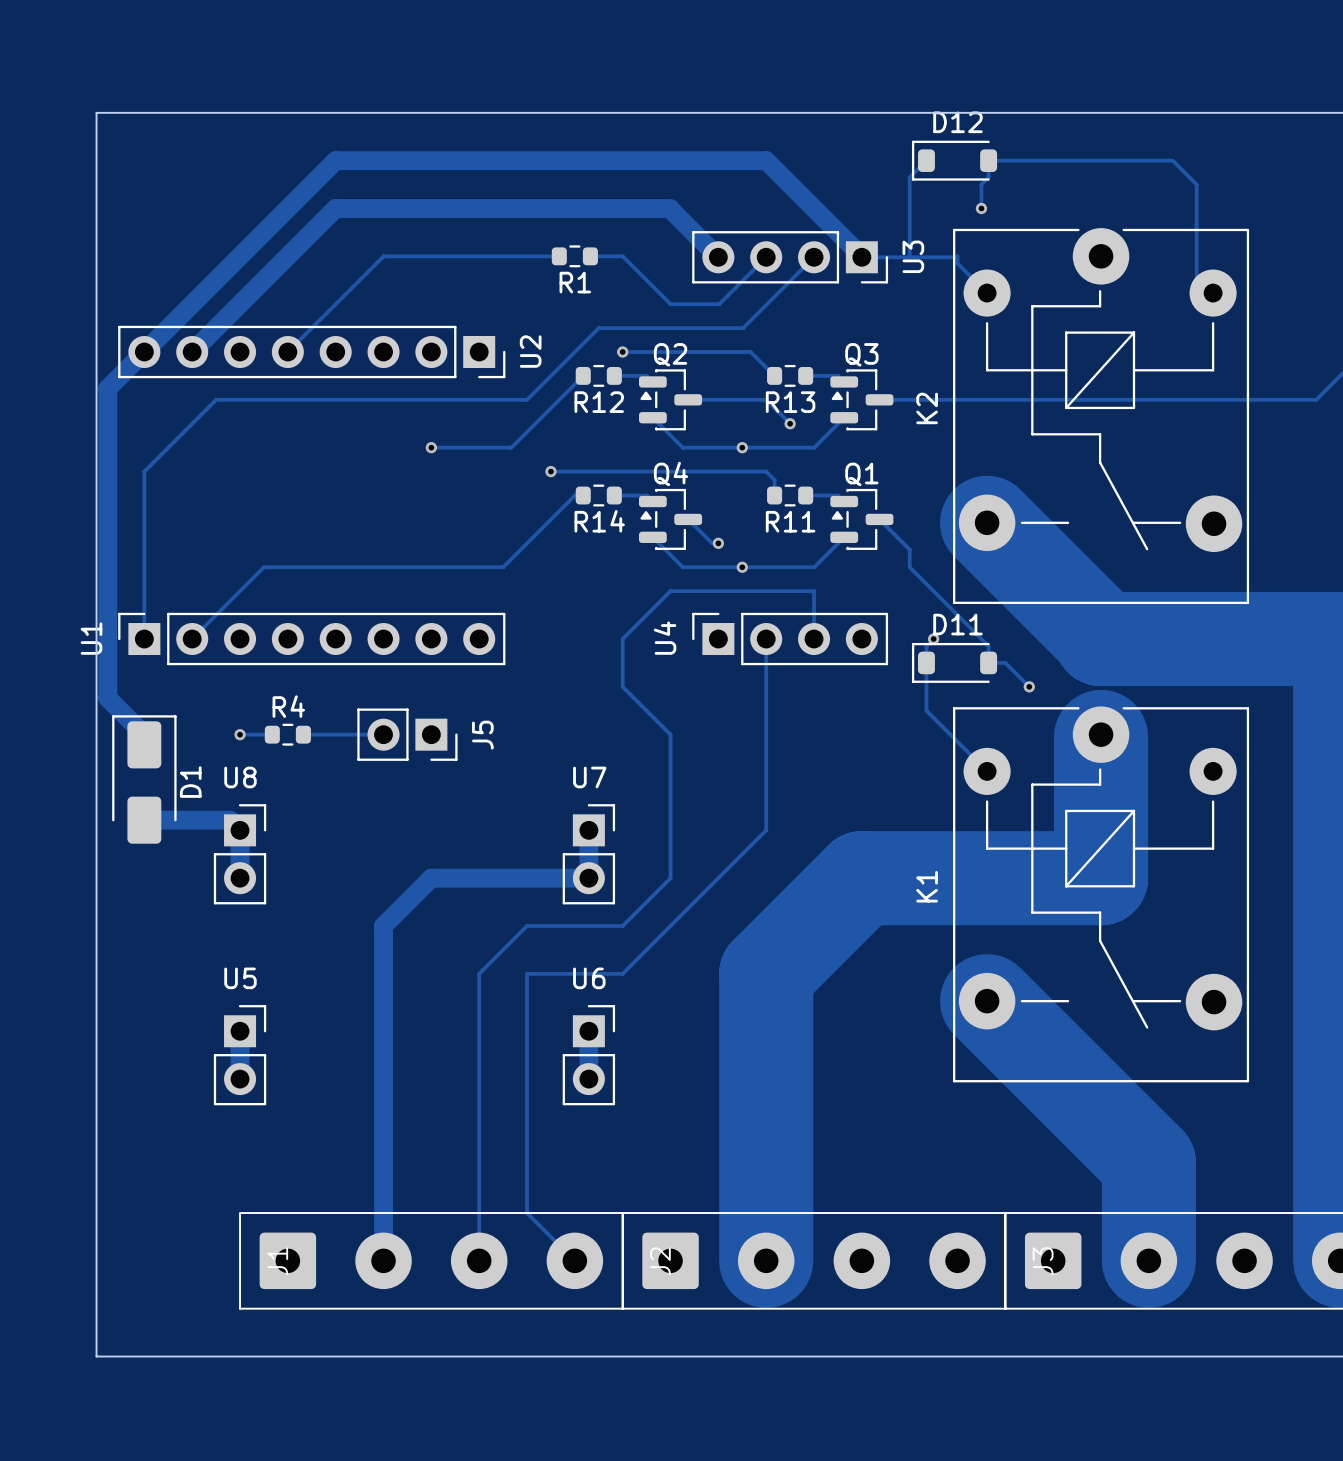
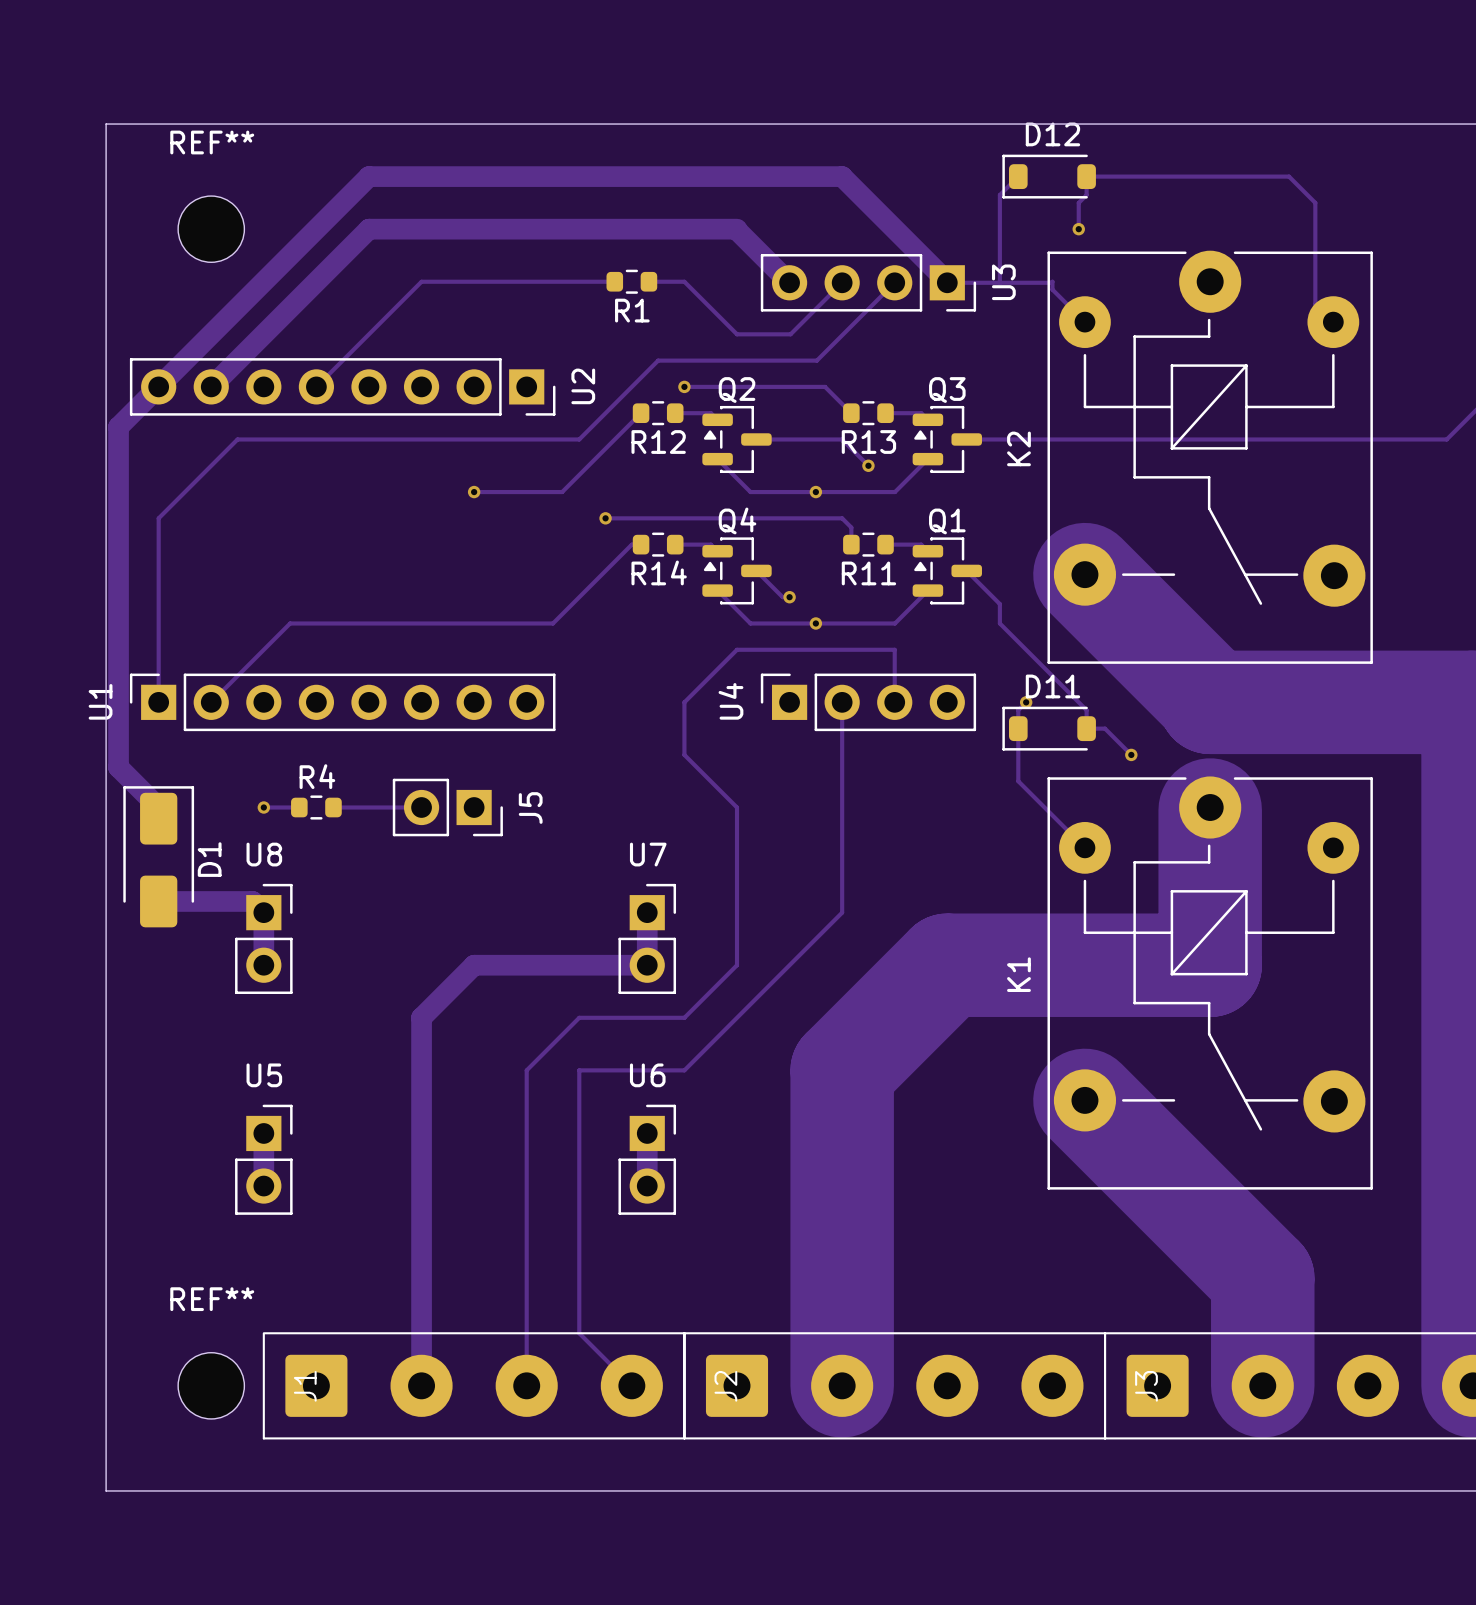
REF**: none -> (211, 229)
REF**: none -> (211, 1385)

